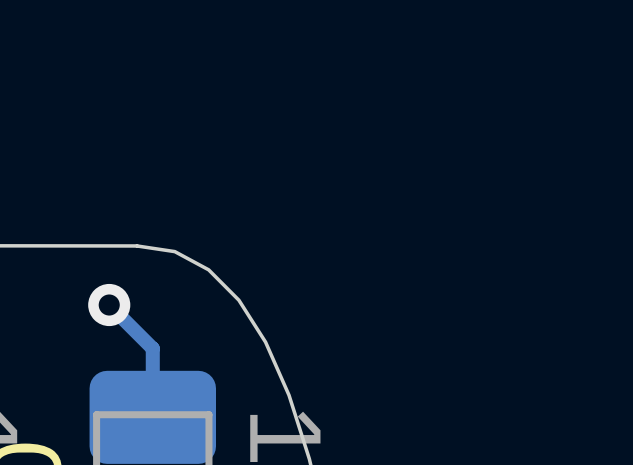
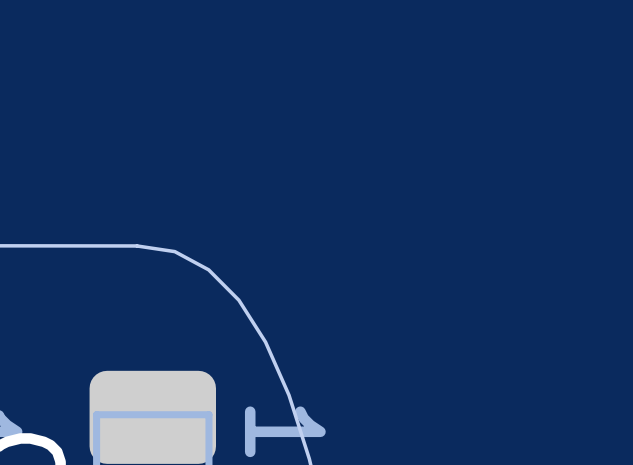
track: (109, 305) (152, 348) (152, 417) -> none
via: (109, 305) -> none

